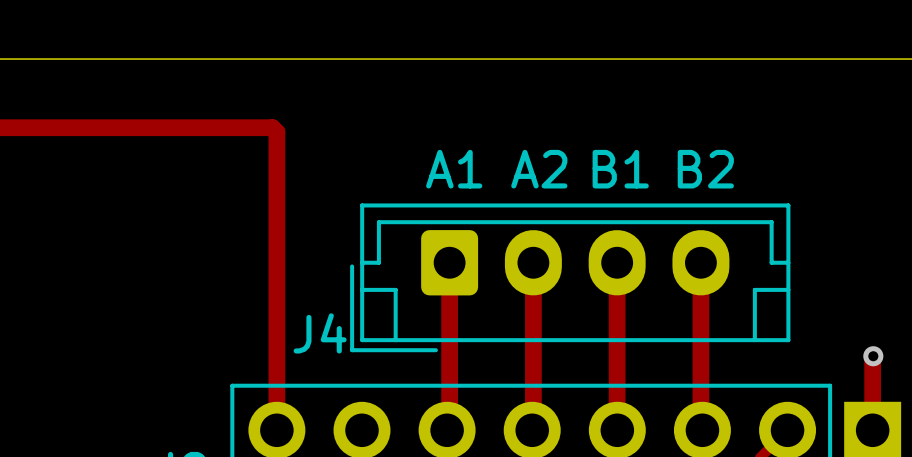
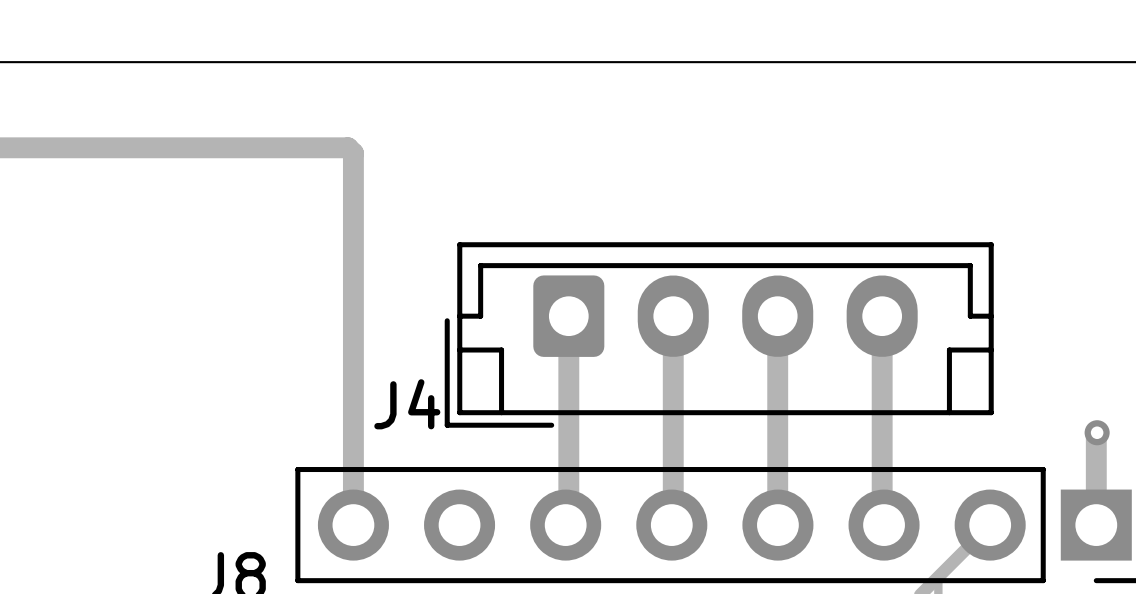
text: A1 (454, 169) -> none
text: A2 (539, 169) -> none
text: B1 (620, 169) -> none
text: B2 (705, 169) -> none

